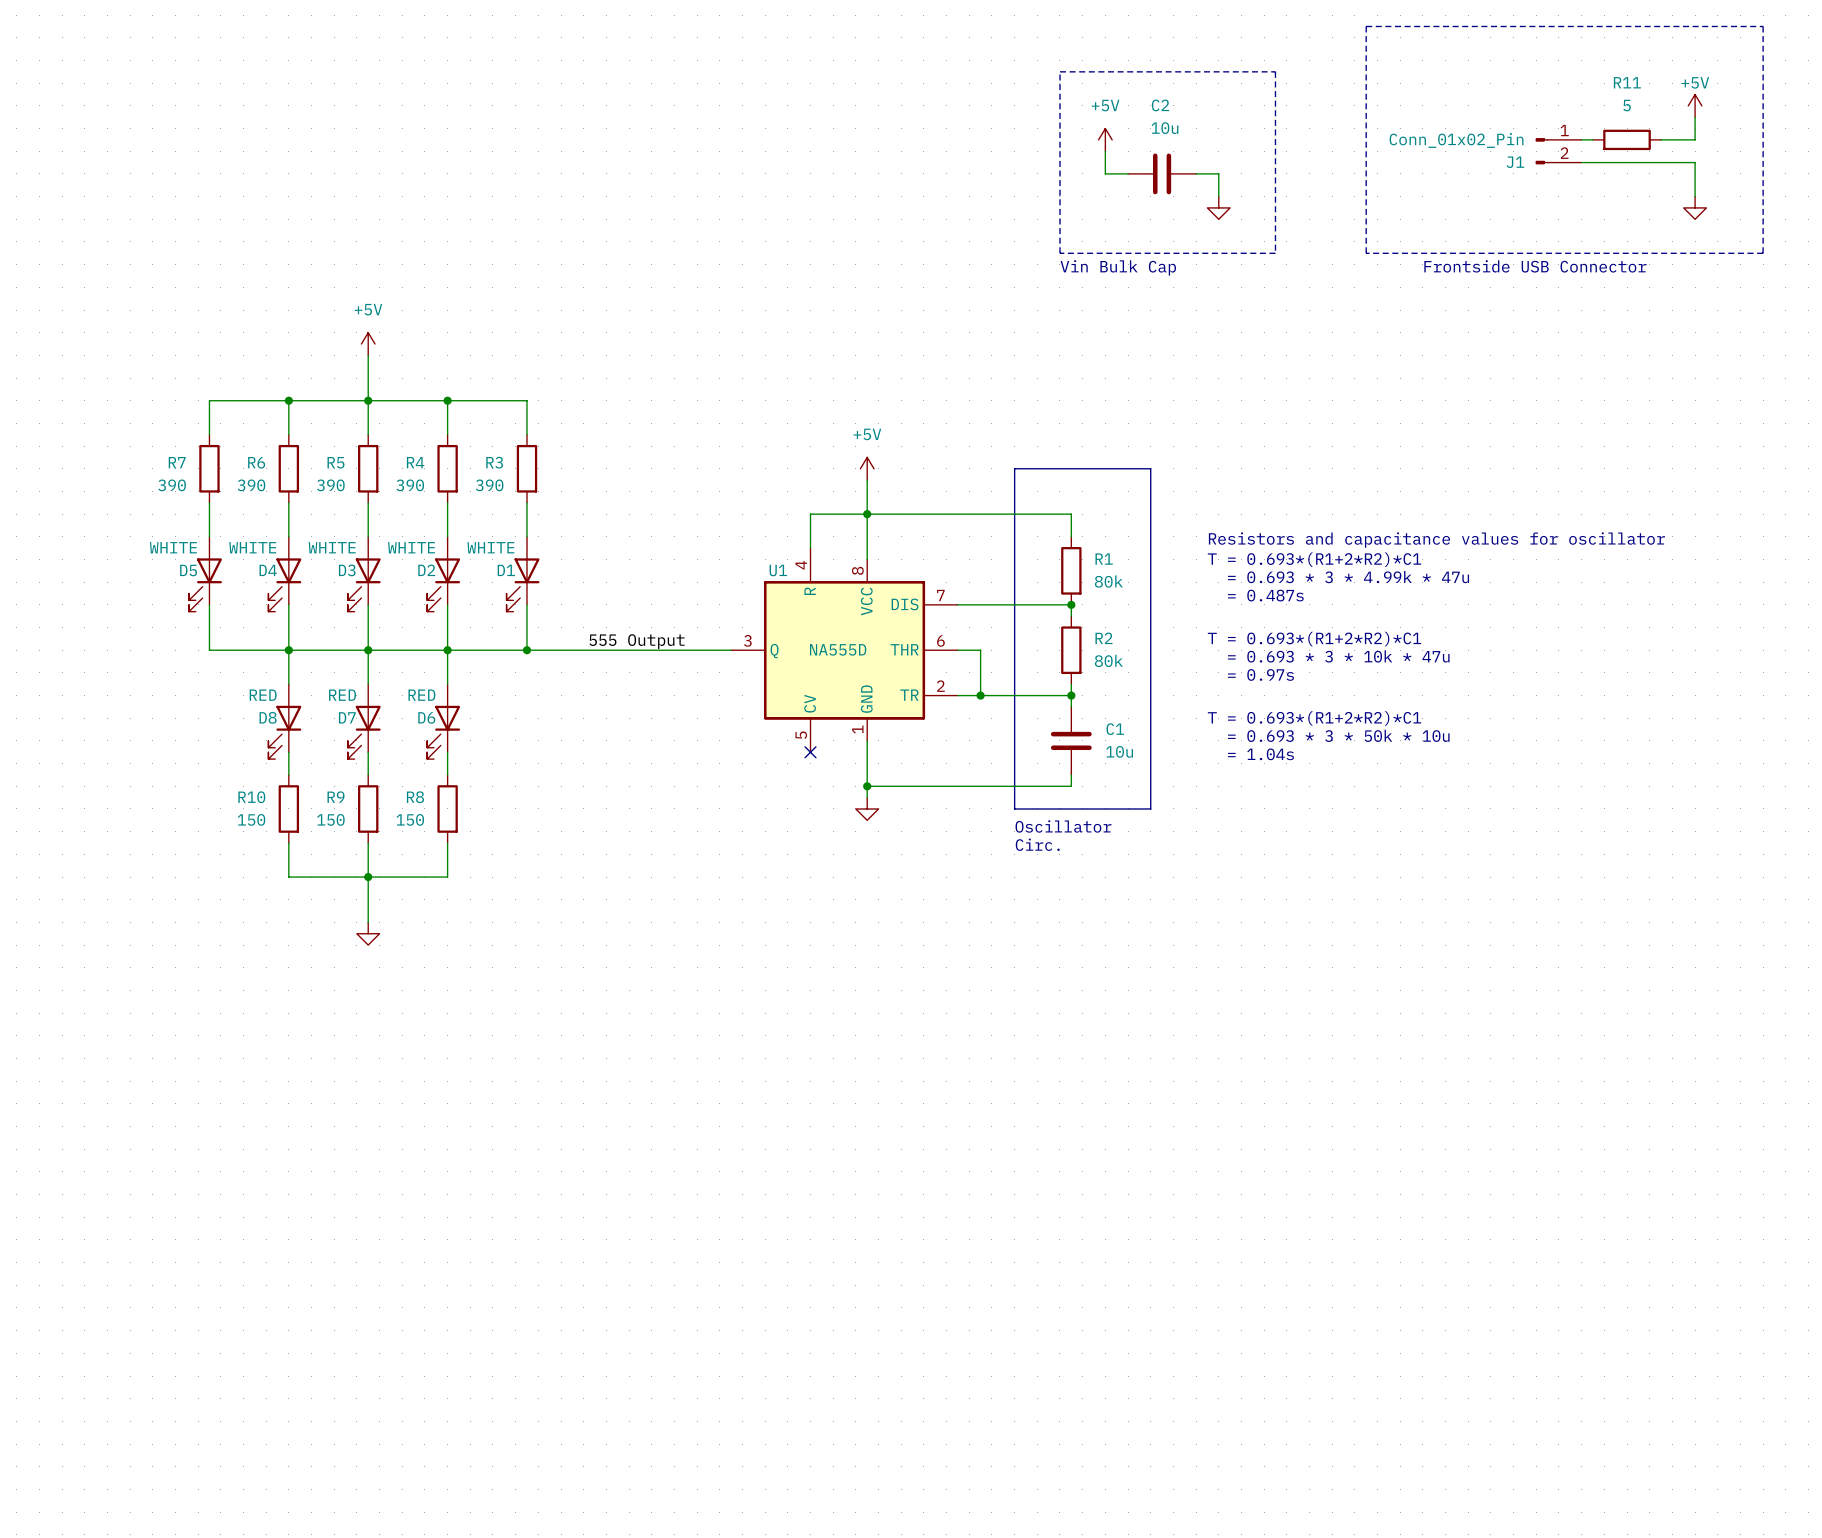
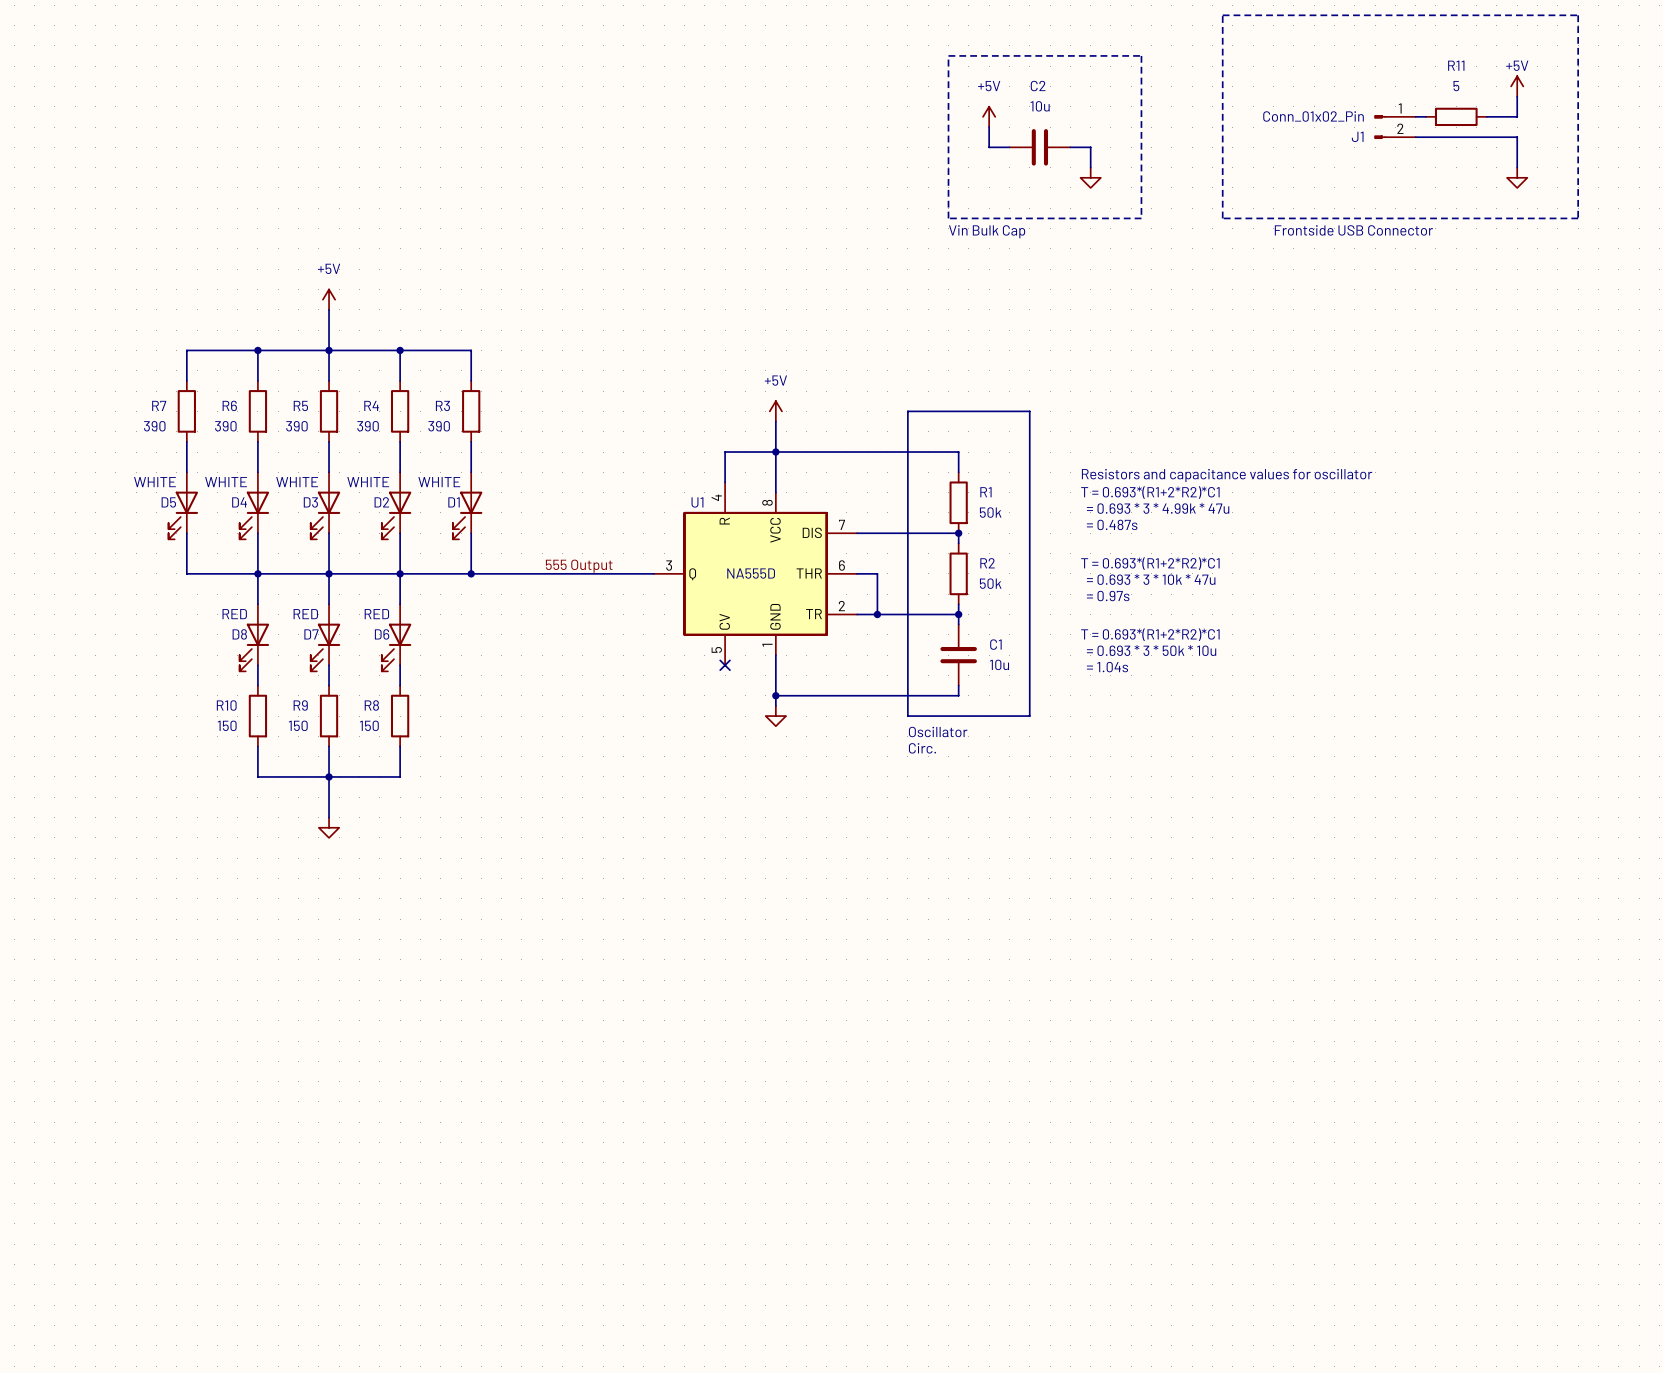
R1 value: 80k (1108, 581) -> 50k (990, 512)
R2 value: 80k (1108, 660) -> 50k (990, 583)

